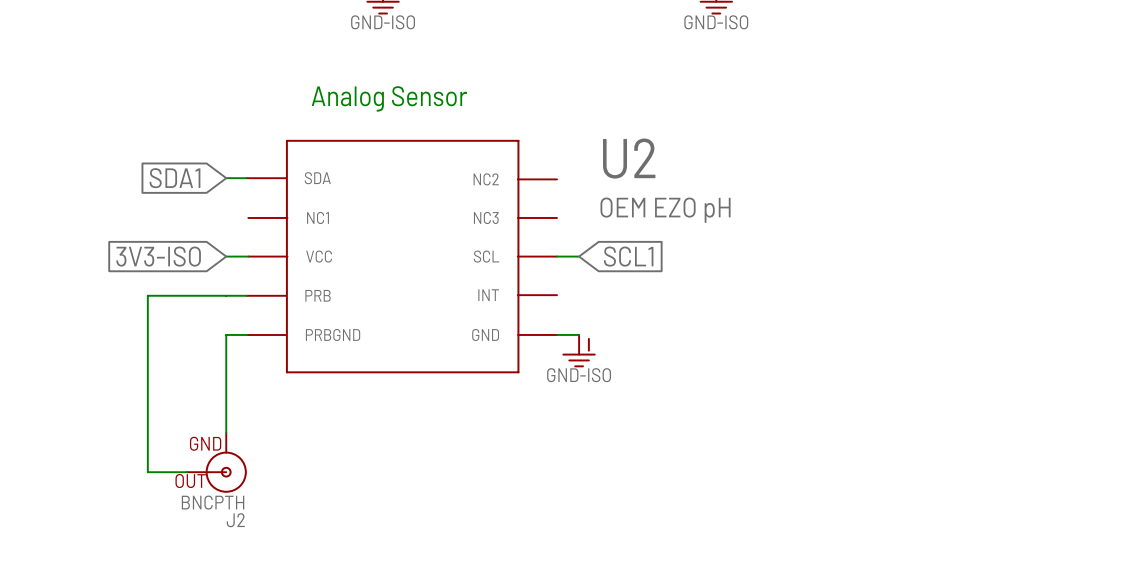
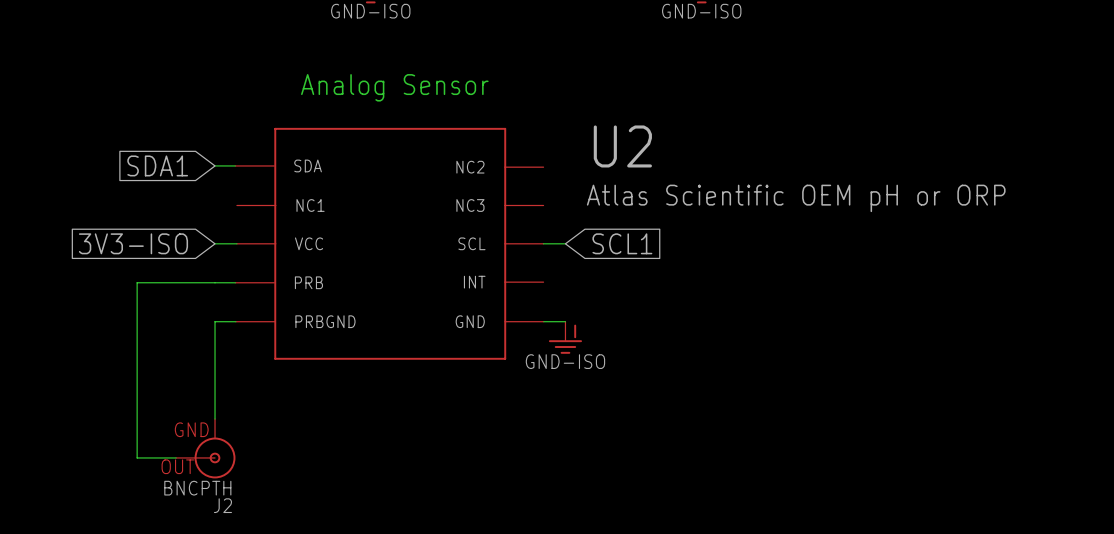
U2 value: OEM EZO pH (665, 210) -> Atlas Scientific OEM pH or ORP (796, 198)

